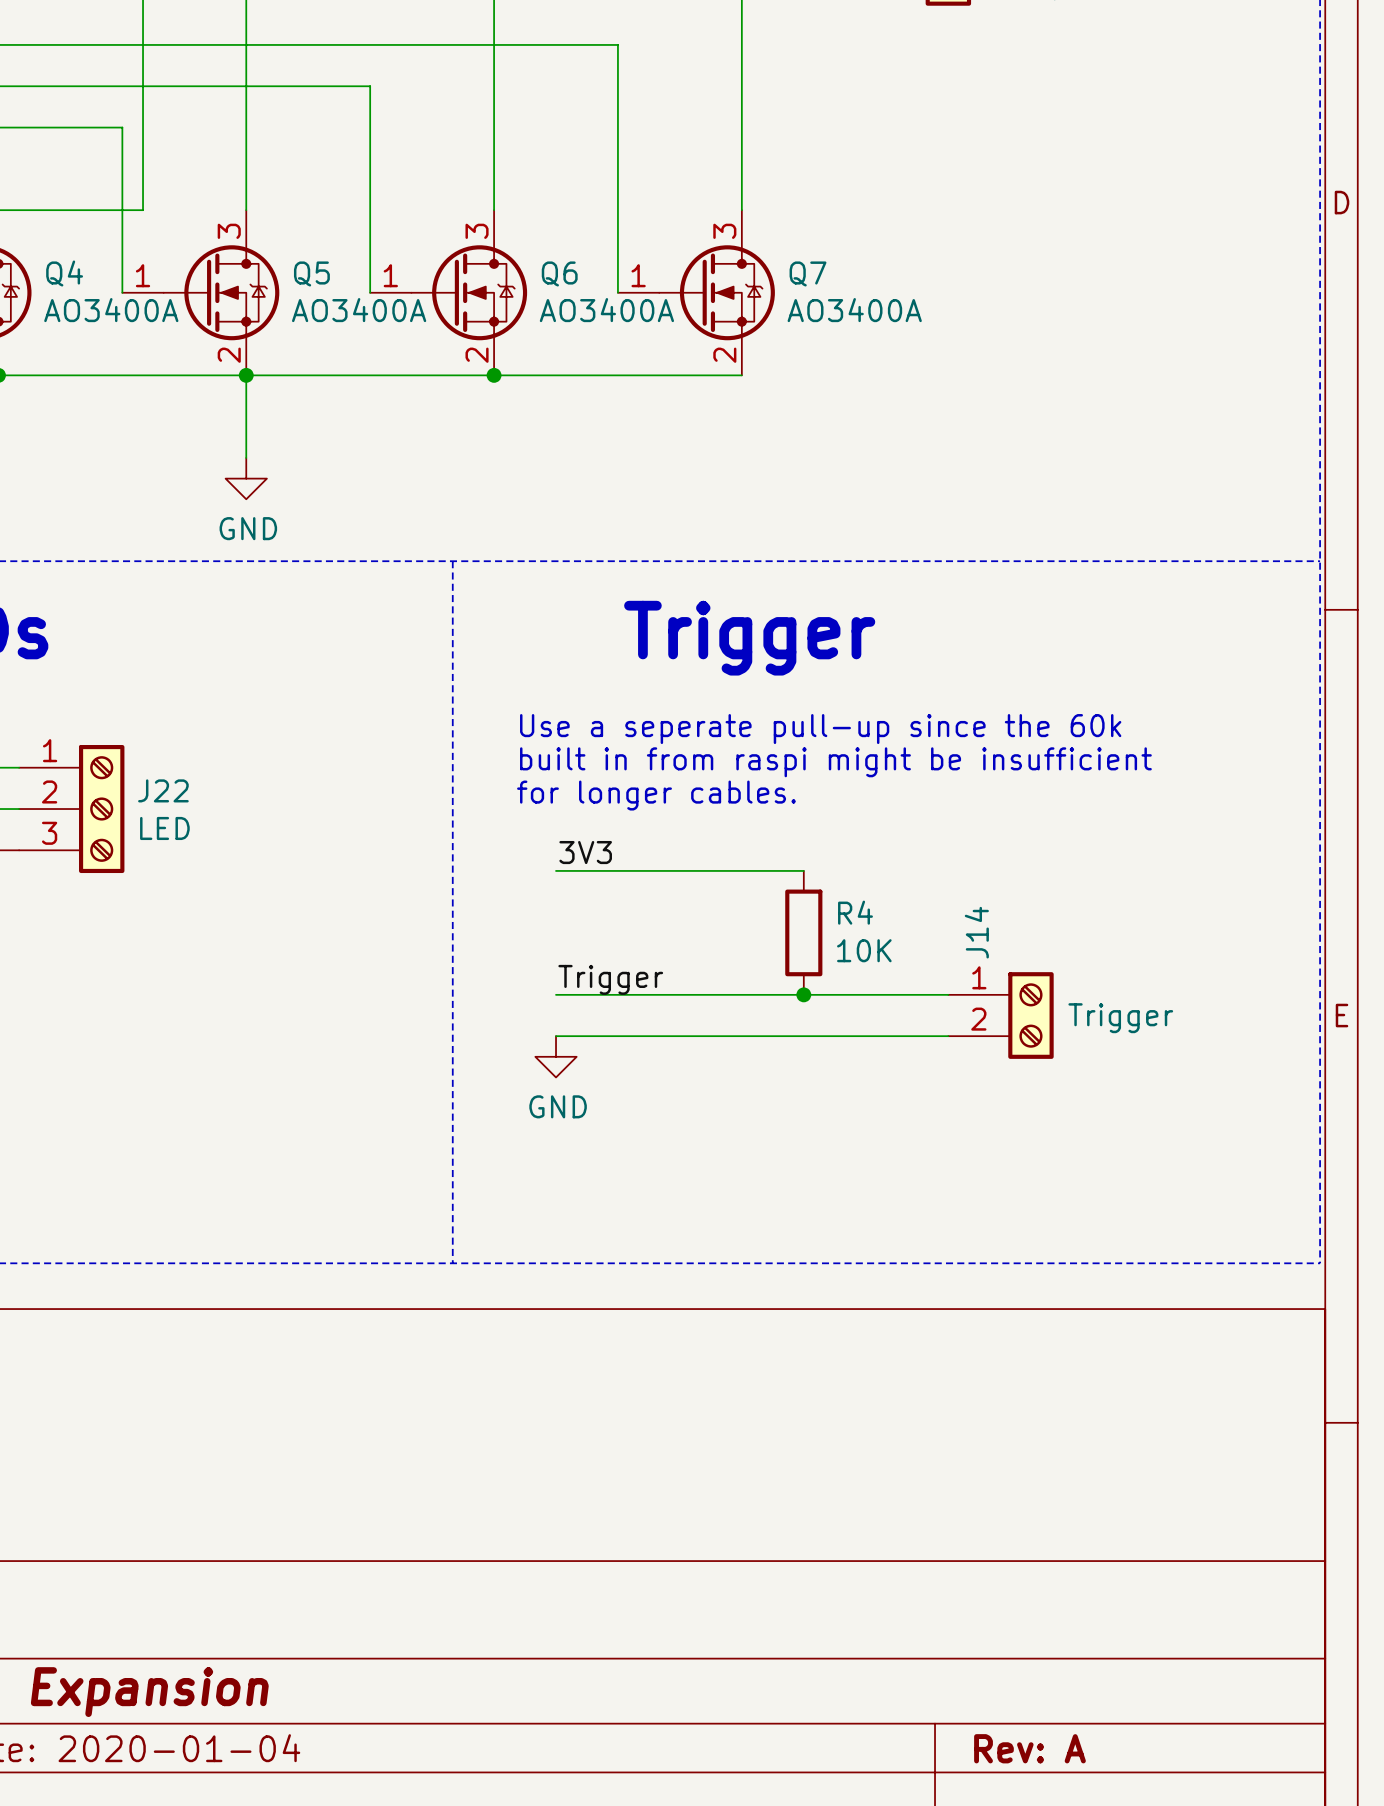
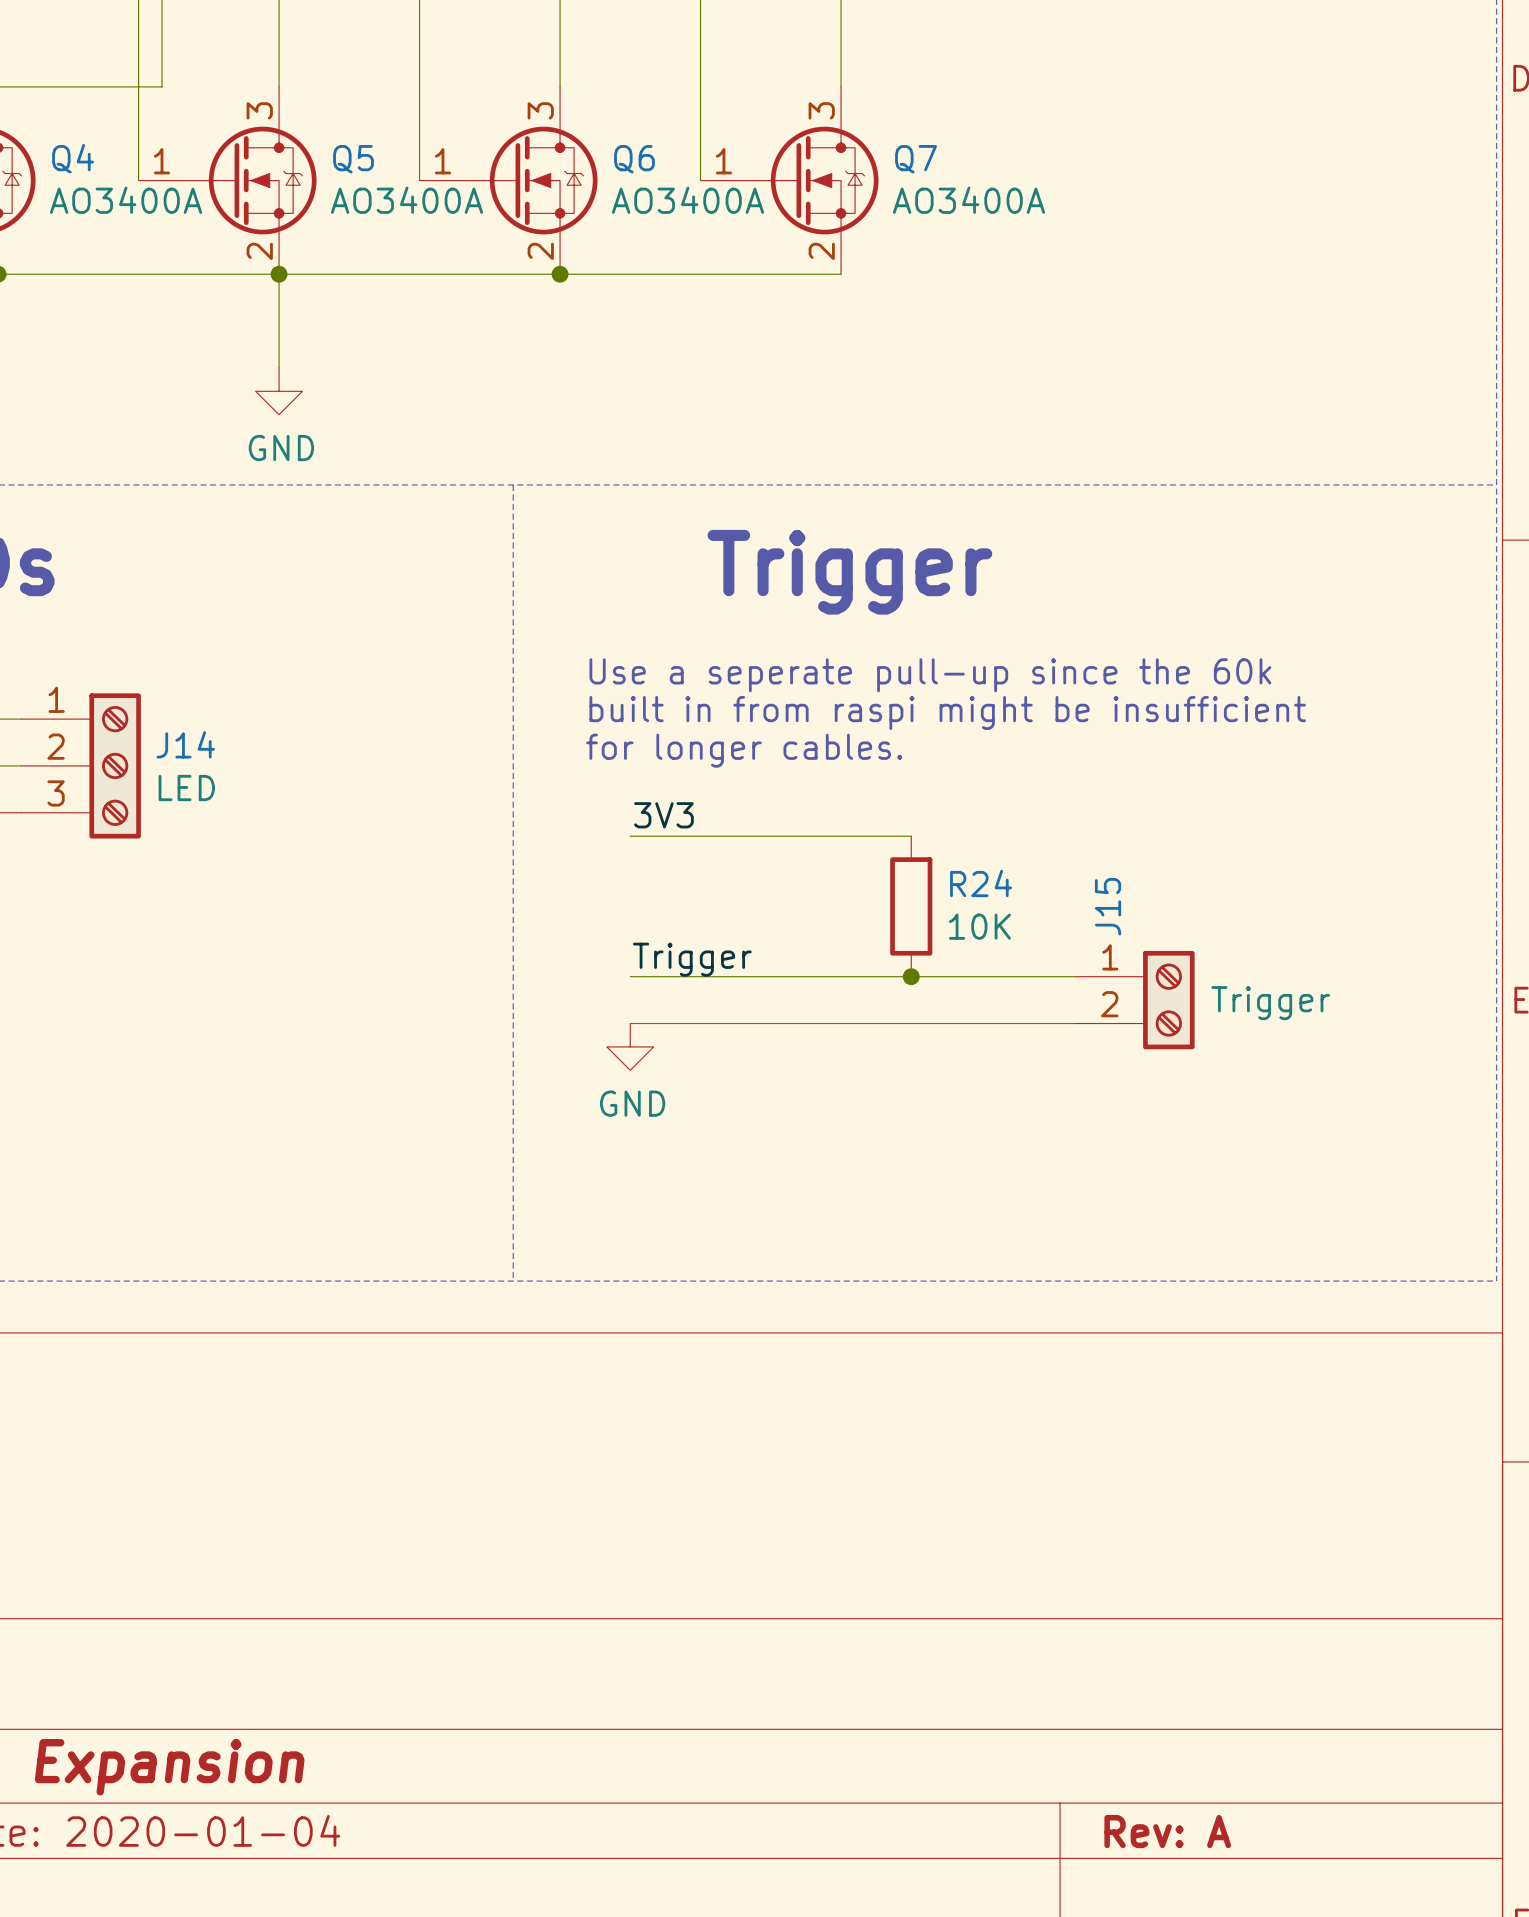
J22 name: J22 (163, 790) -> J14 (185, 744)
R4 name: R4 (855, 912) -> R24 (981, 883)
J14 name: J14 (976, 932) -> J15 (1108, 906)

